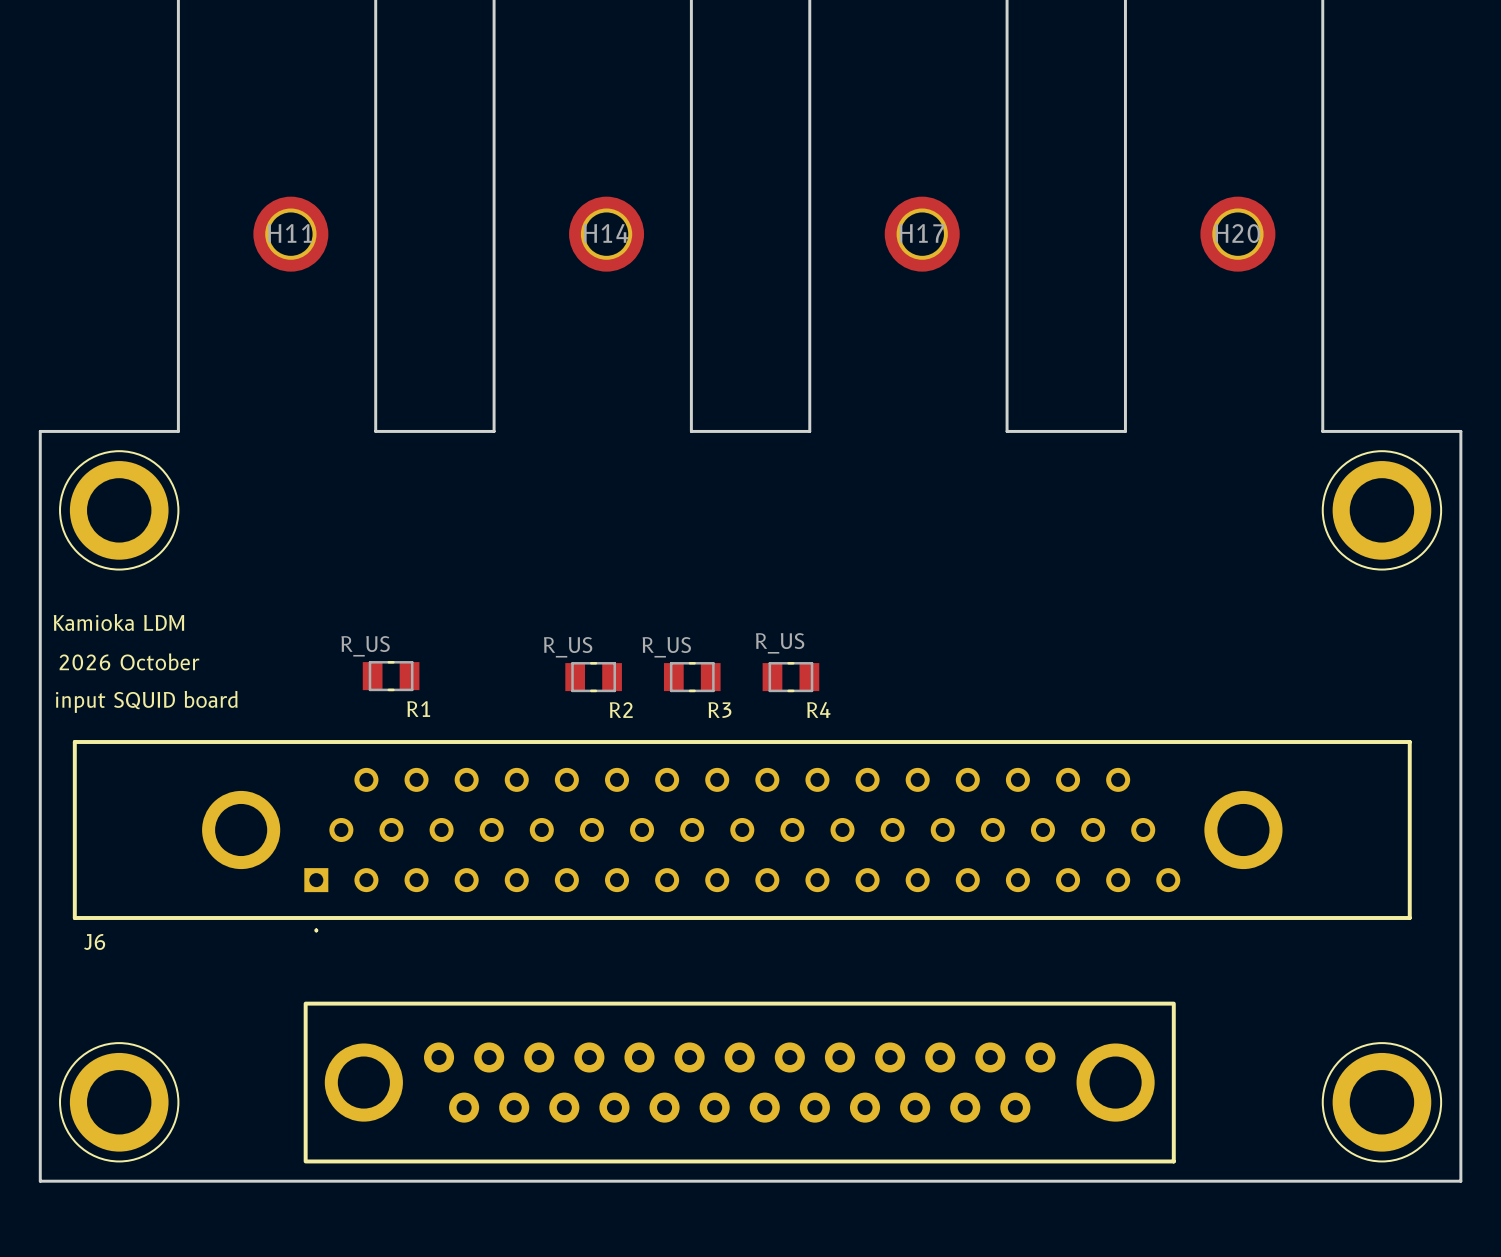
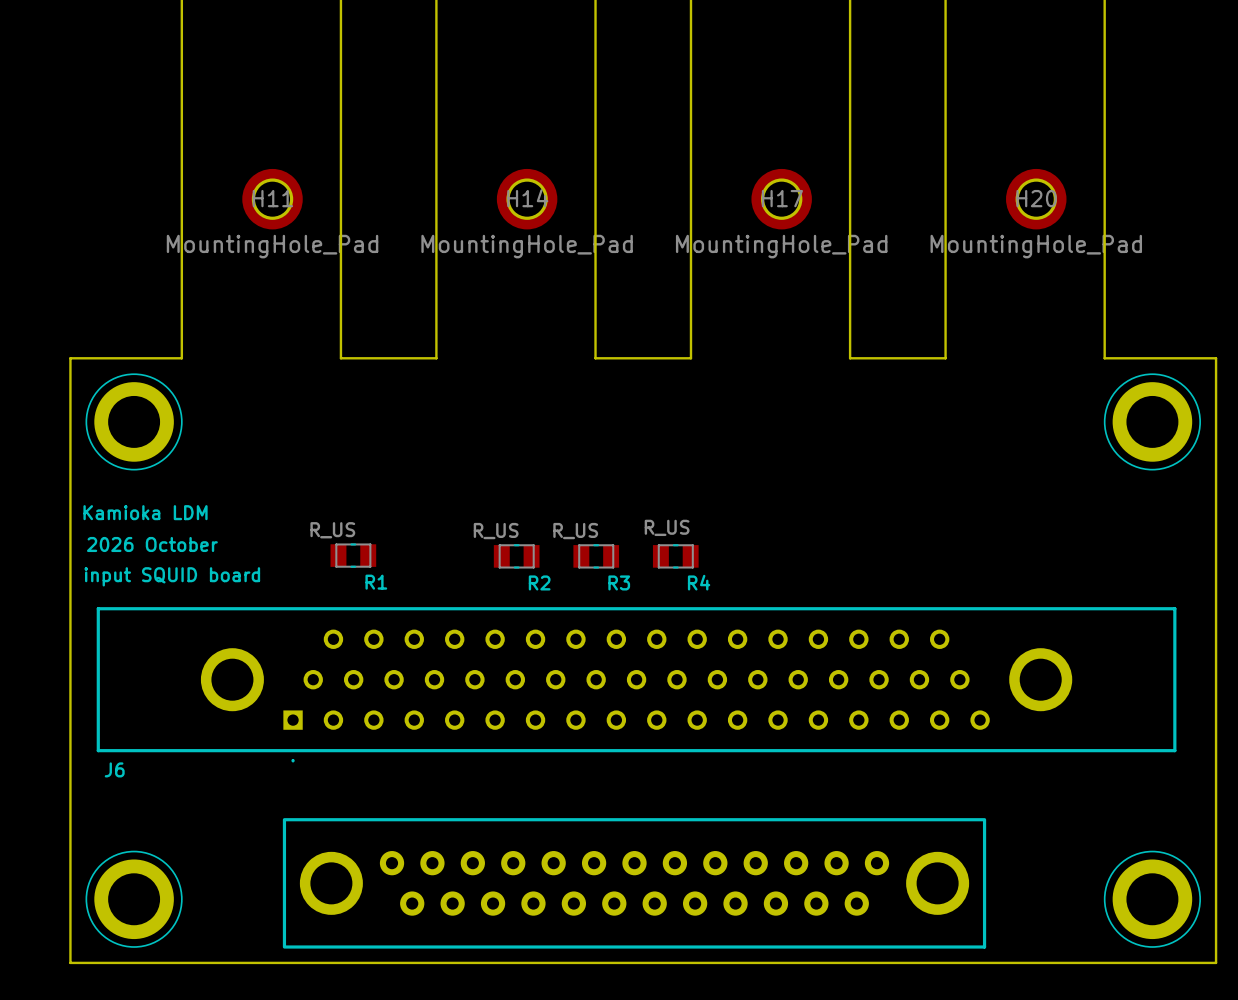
H11 value: none -> MountingHole_Pad (272, 246)
H14 value: none -> MountingHole_Pad (527, 246)
H17 value: none -> MountingHole_Pad (781, 246)
H20 value: none -> MountingHole_Pad (1036, 246)

